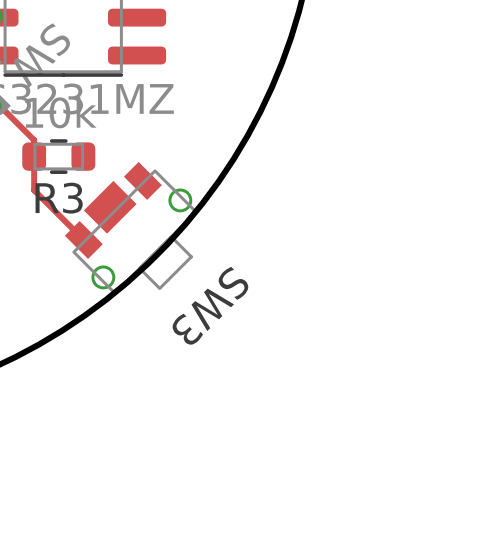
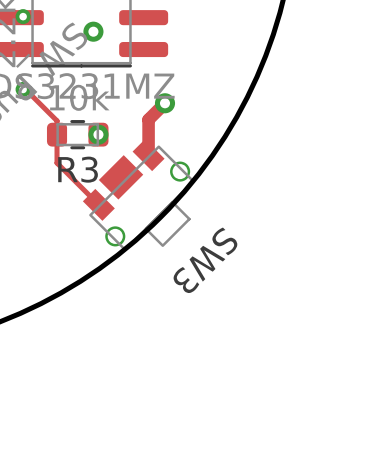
via: none -> (93, 31)
track: none -> (165, 103) (148, 119) (148, 155)
via: none -> (165, 103)
via: none -> (98, 134)

